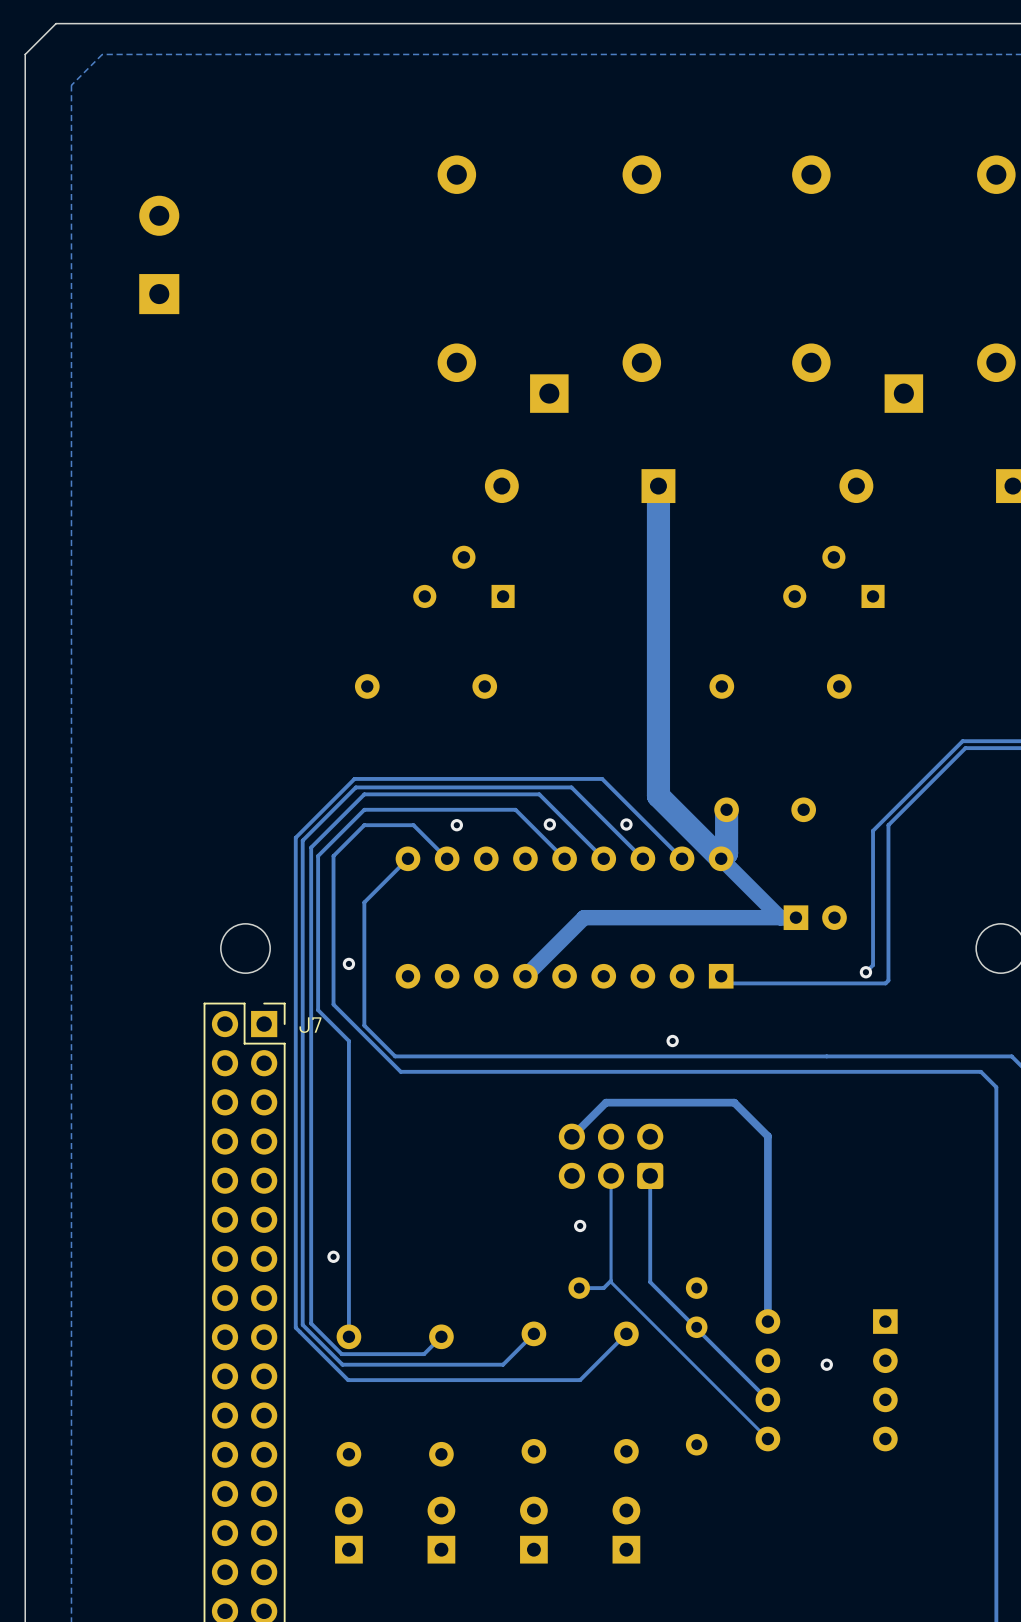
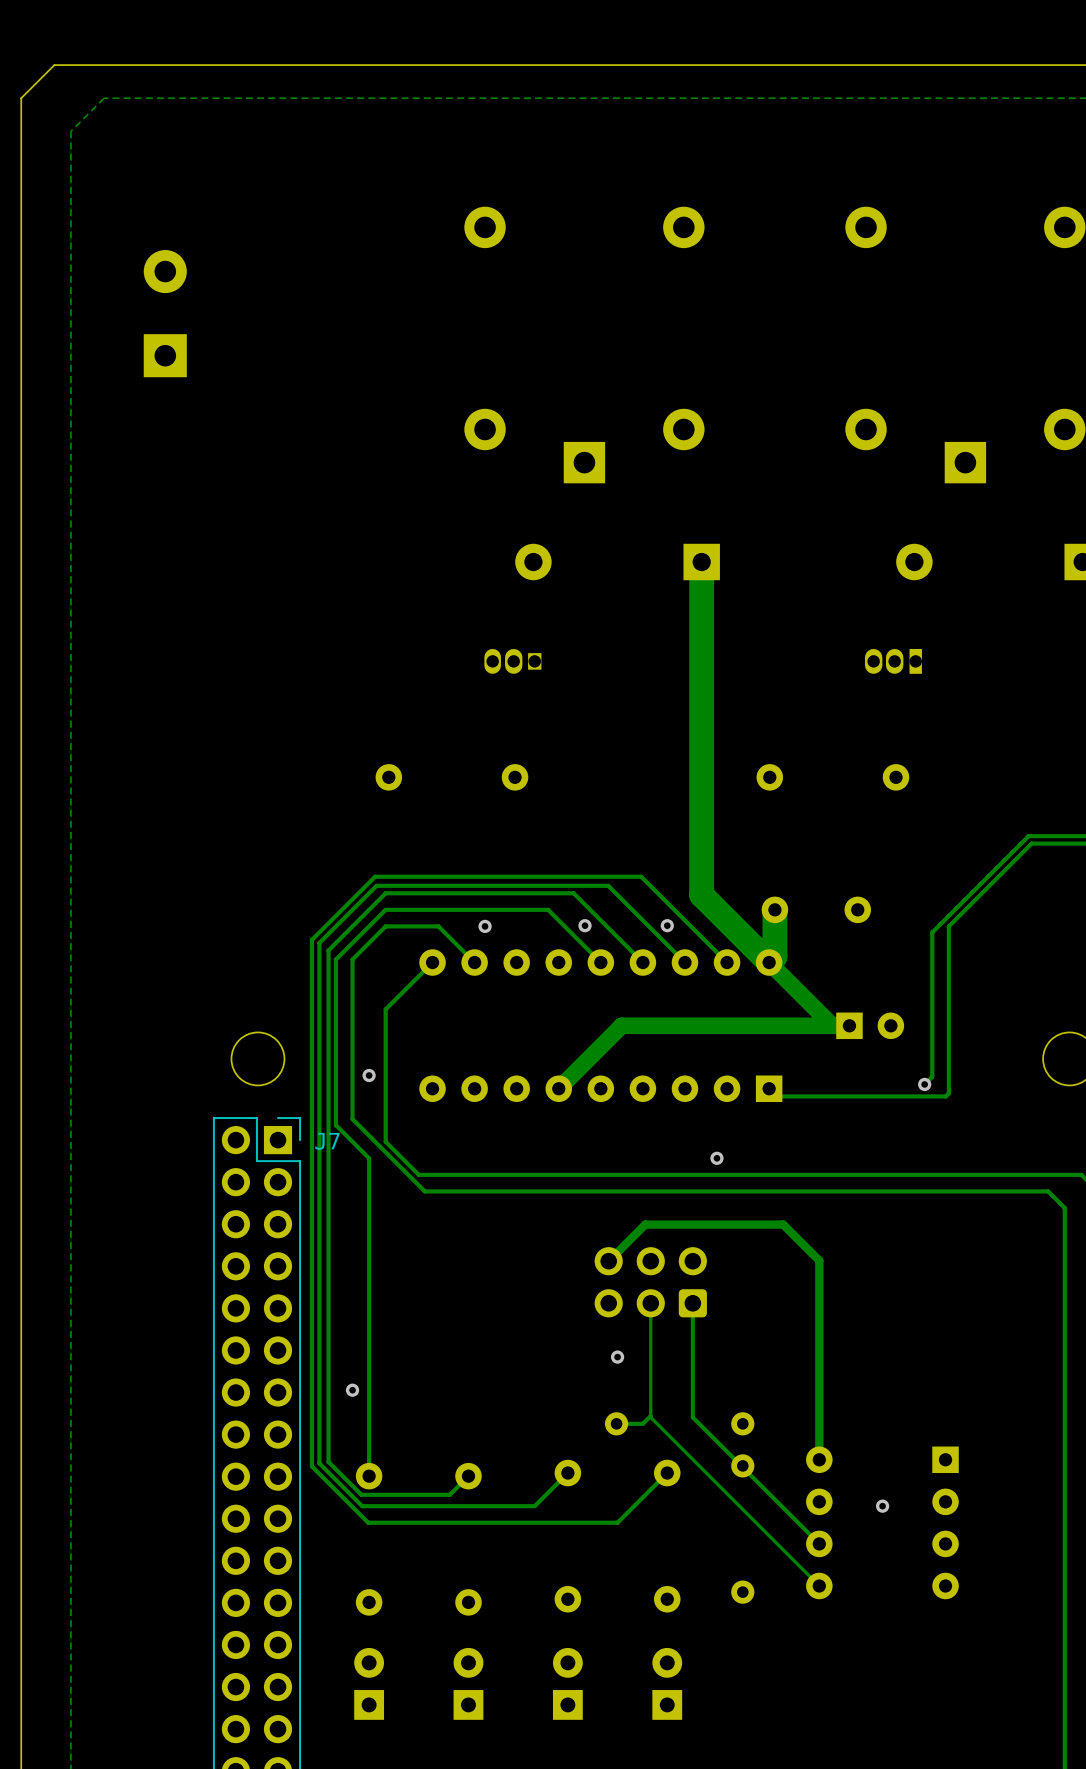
part footprint: [783, 545, 885, 609] -> [864, 648, 922, 674]
part: (463, 576) -> none
part: none -> (512, 661)

